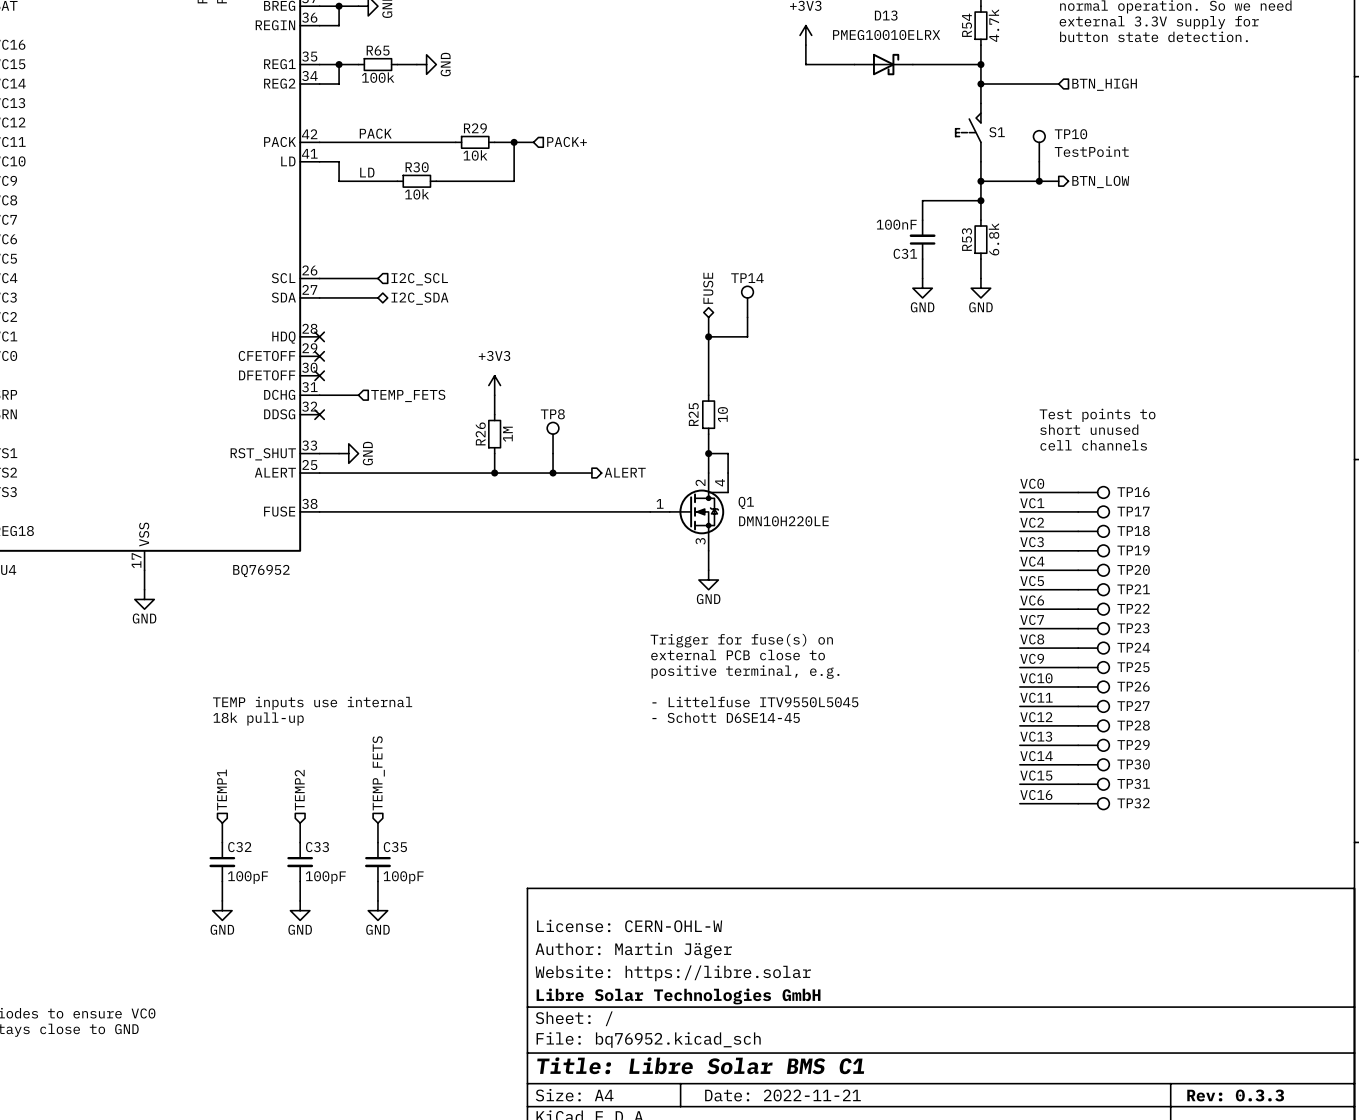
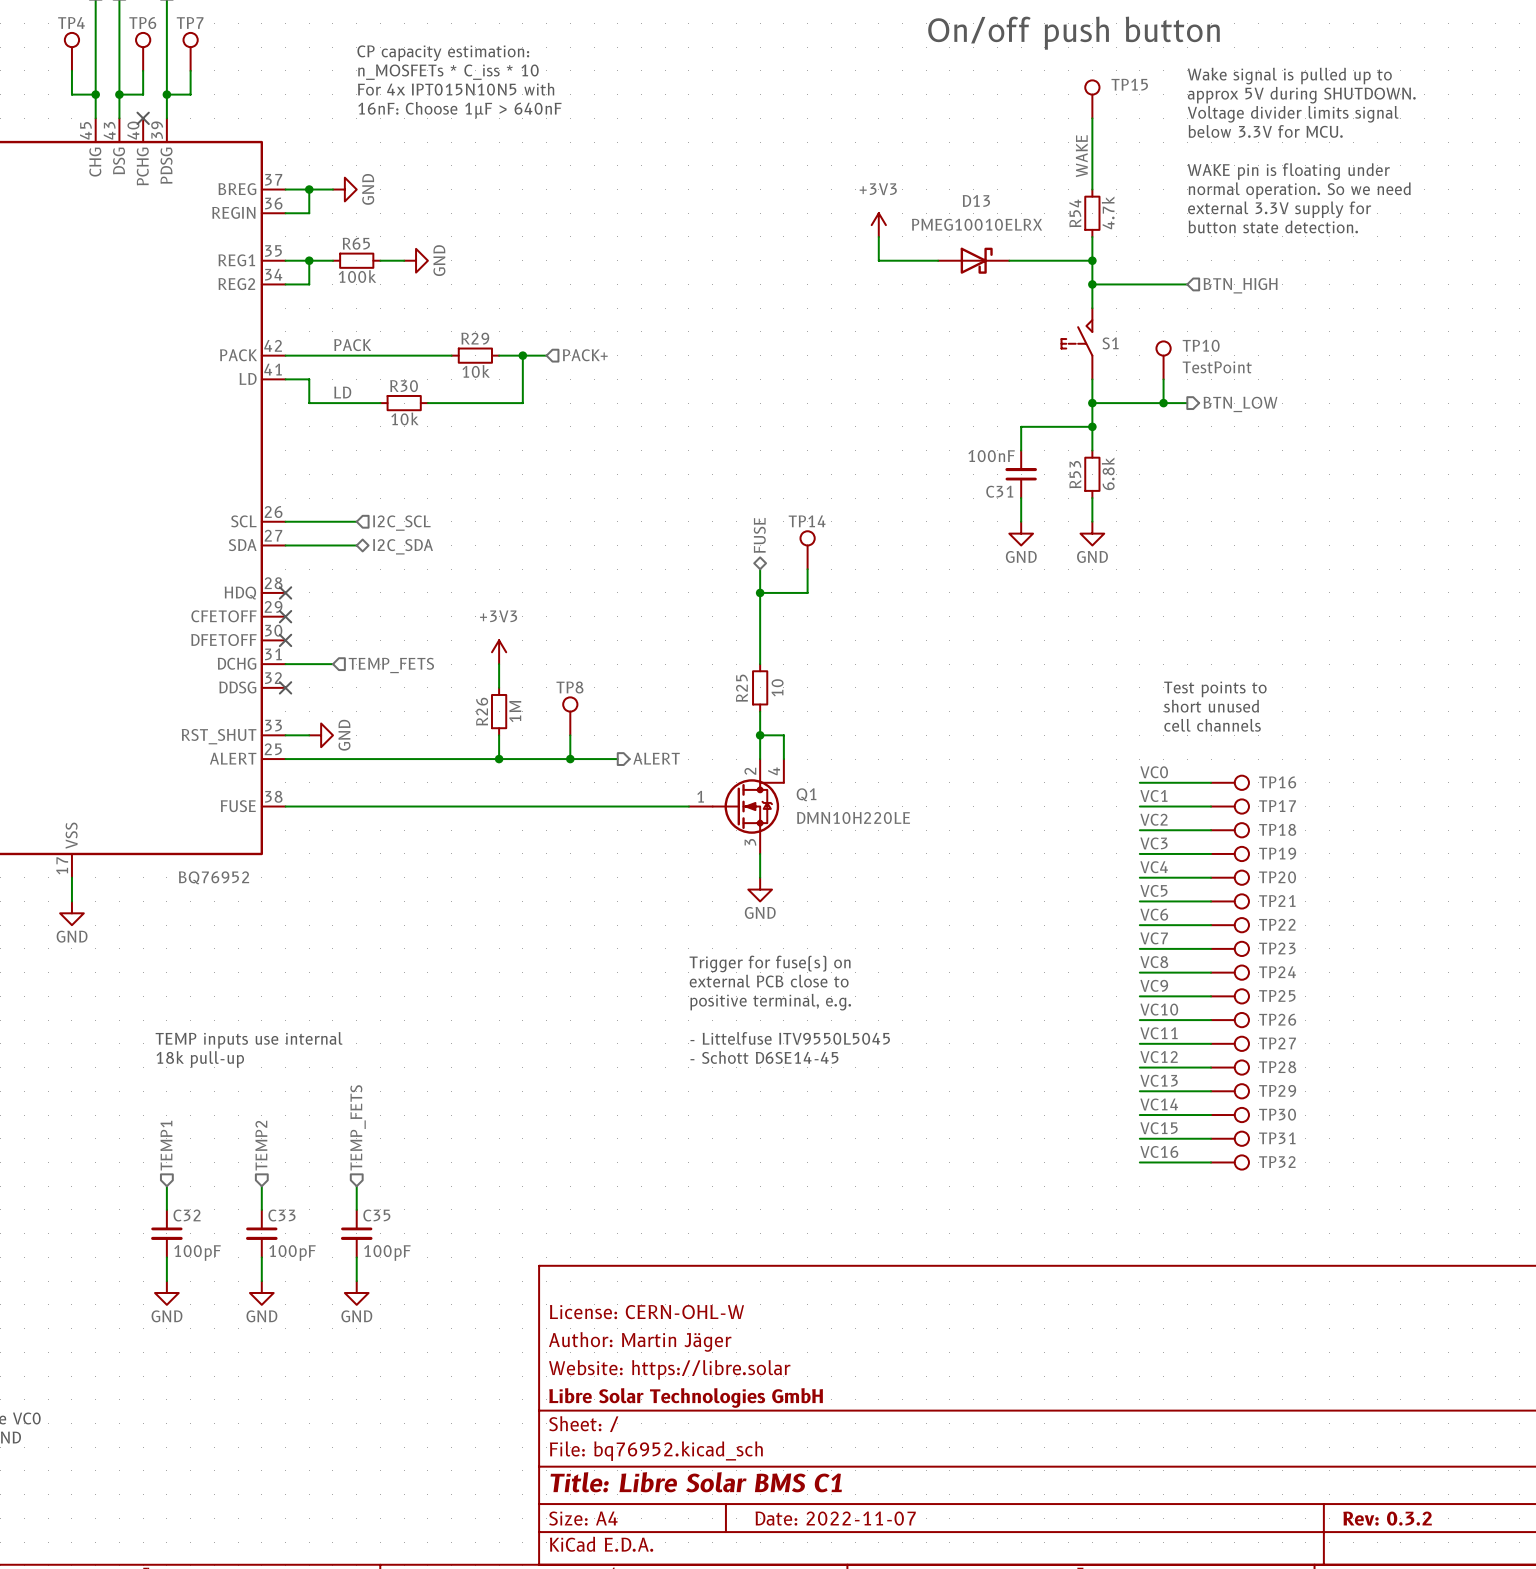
title block: Date: 2022-11-21 (782, 1095) -> Date: 2022-11-07 (835, 1518)
title block: Rev: 0.3.3 (1235, 1095) -> Rev: 0.3.2 (1387, 1518)

